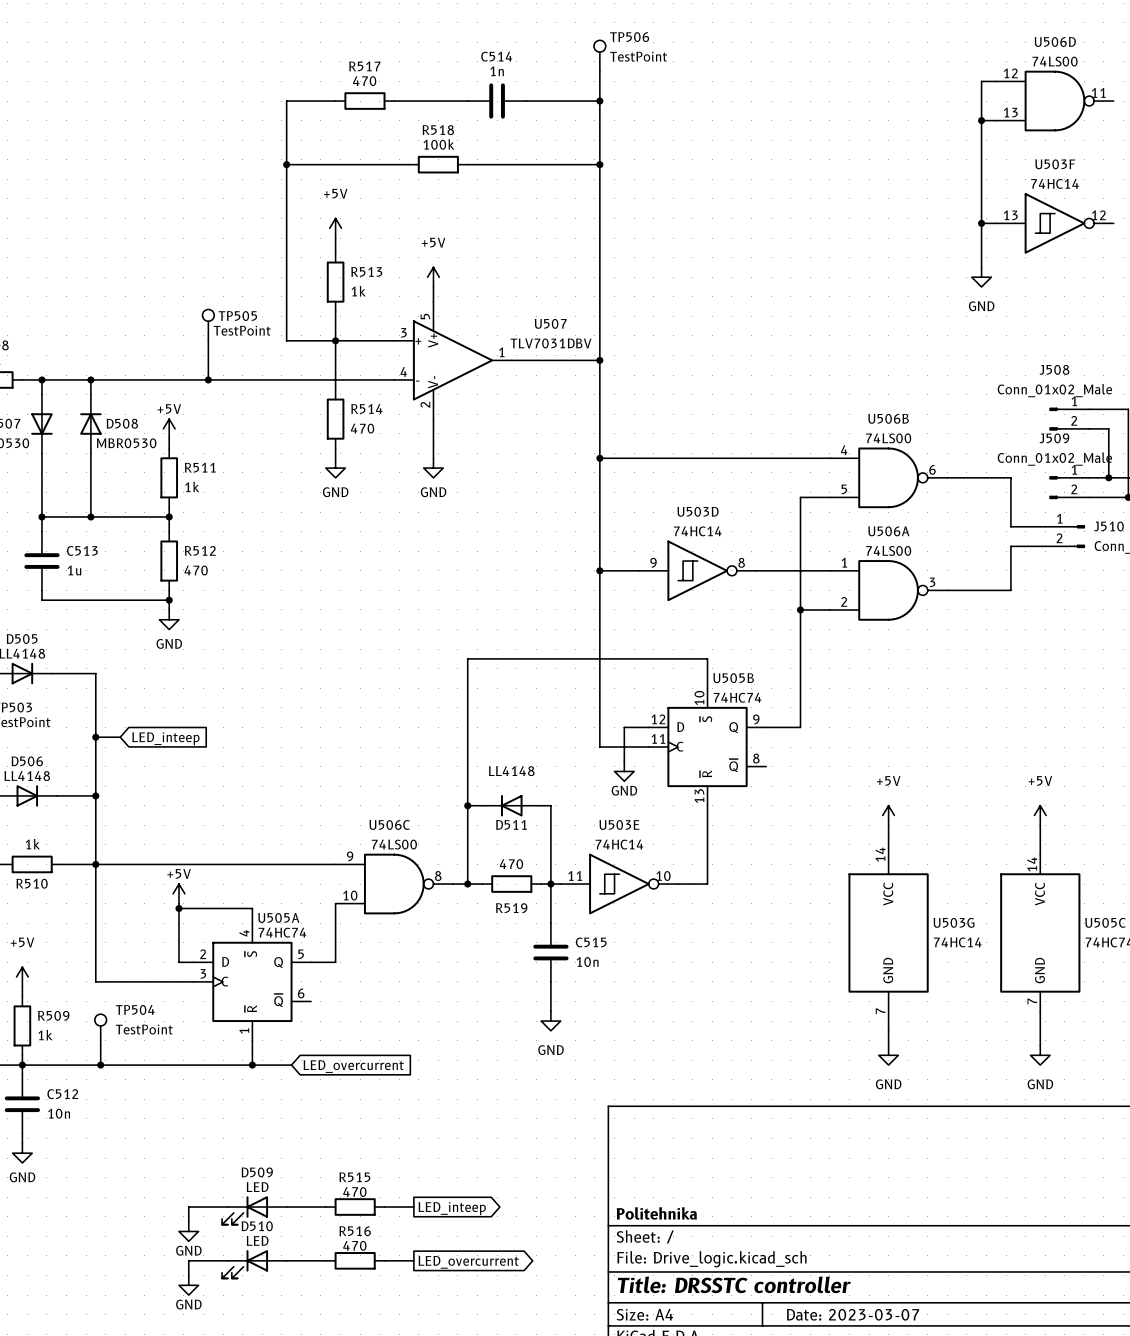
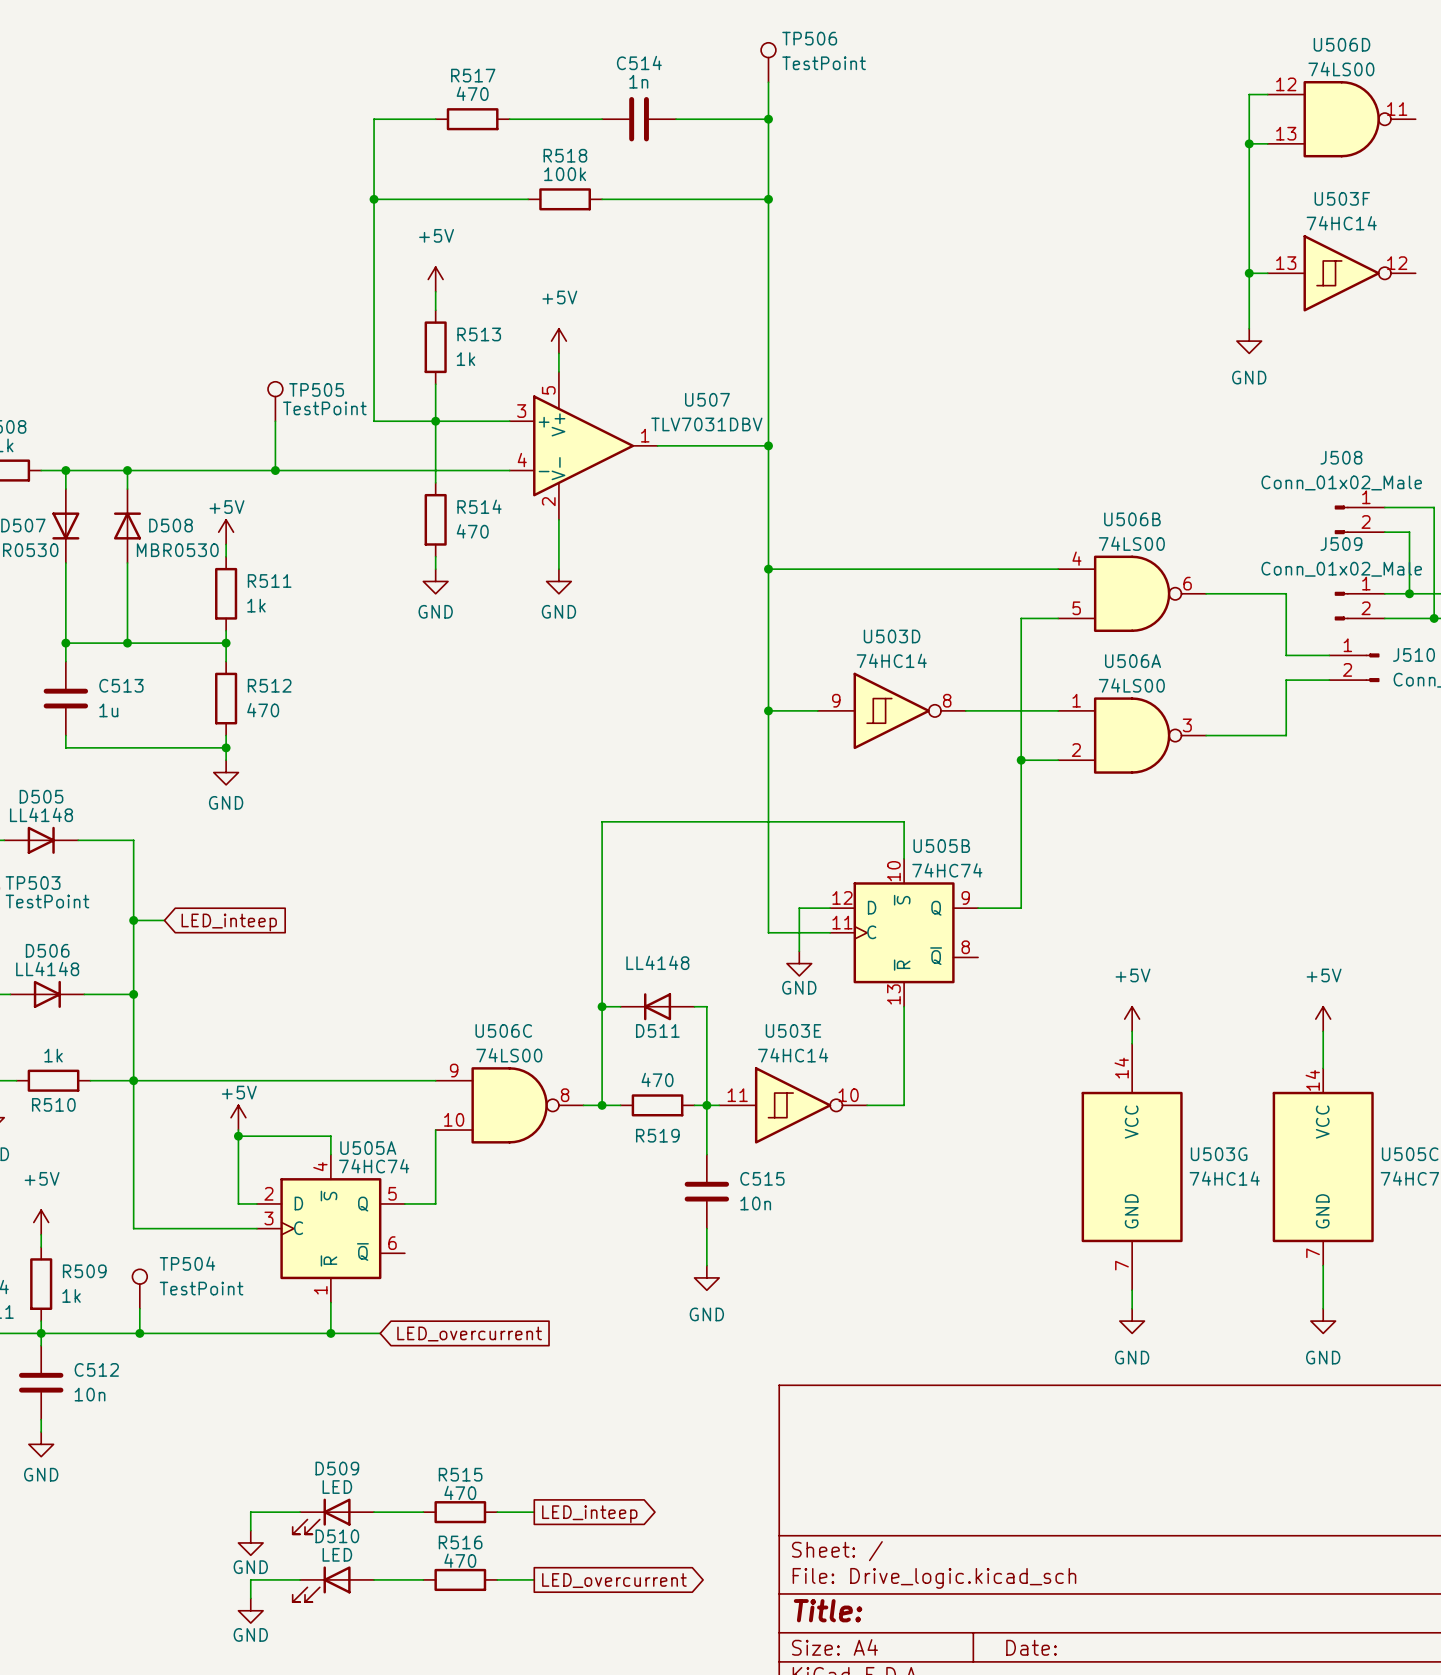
title block: Politehnika (656, 1213) -> none
title block: Title: DRSSTC controller (734, 1284) -> Title: (828, 1610)
title block: Date: 2023-03-07 (853, 1314) -> Date: (1031, 1647)

